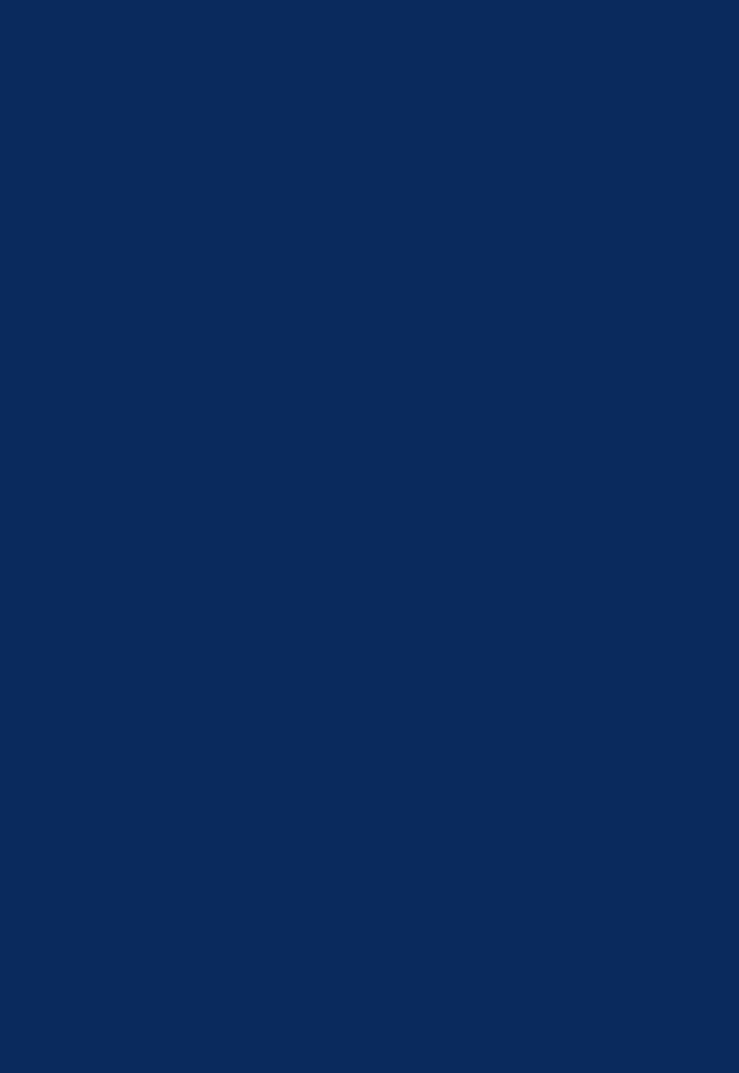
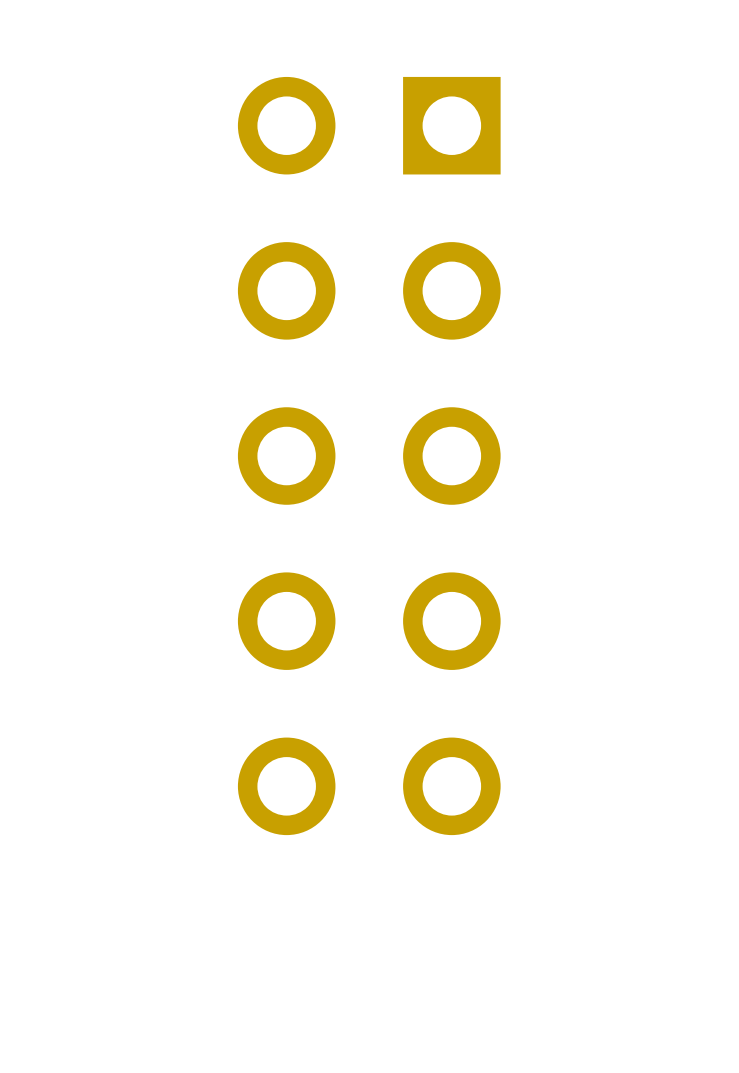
part: none -> (369, 456)

